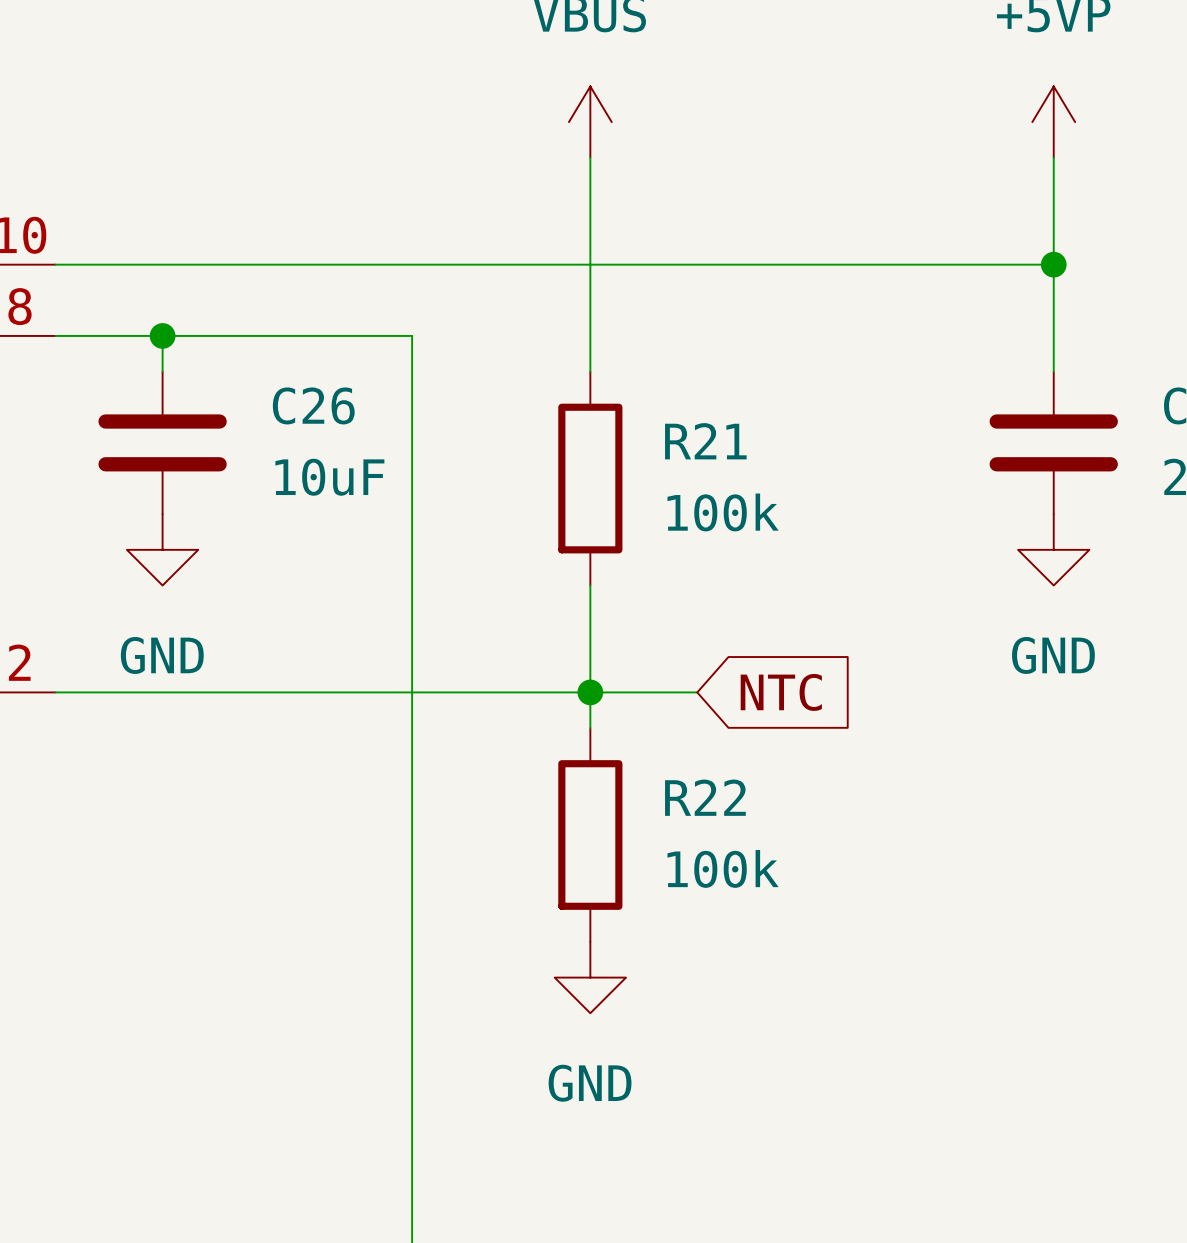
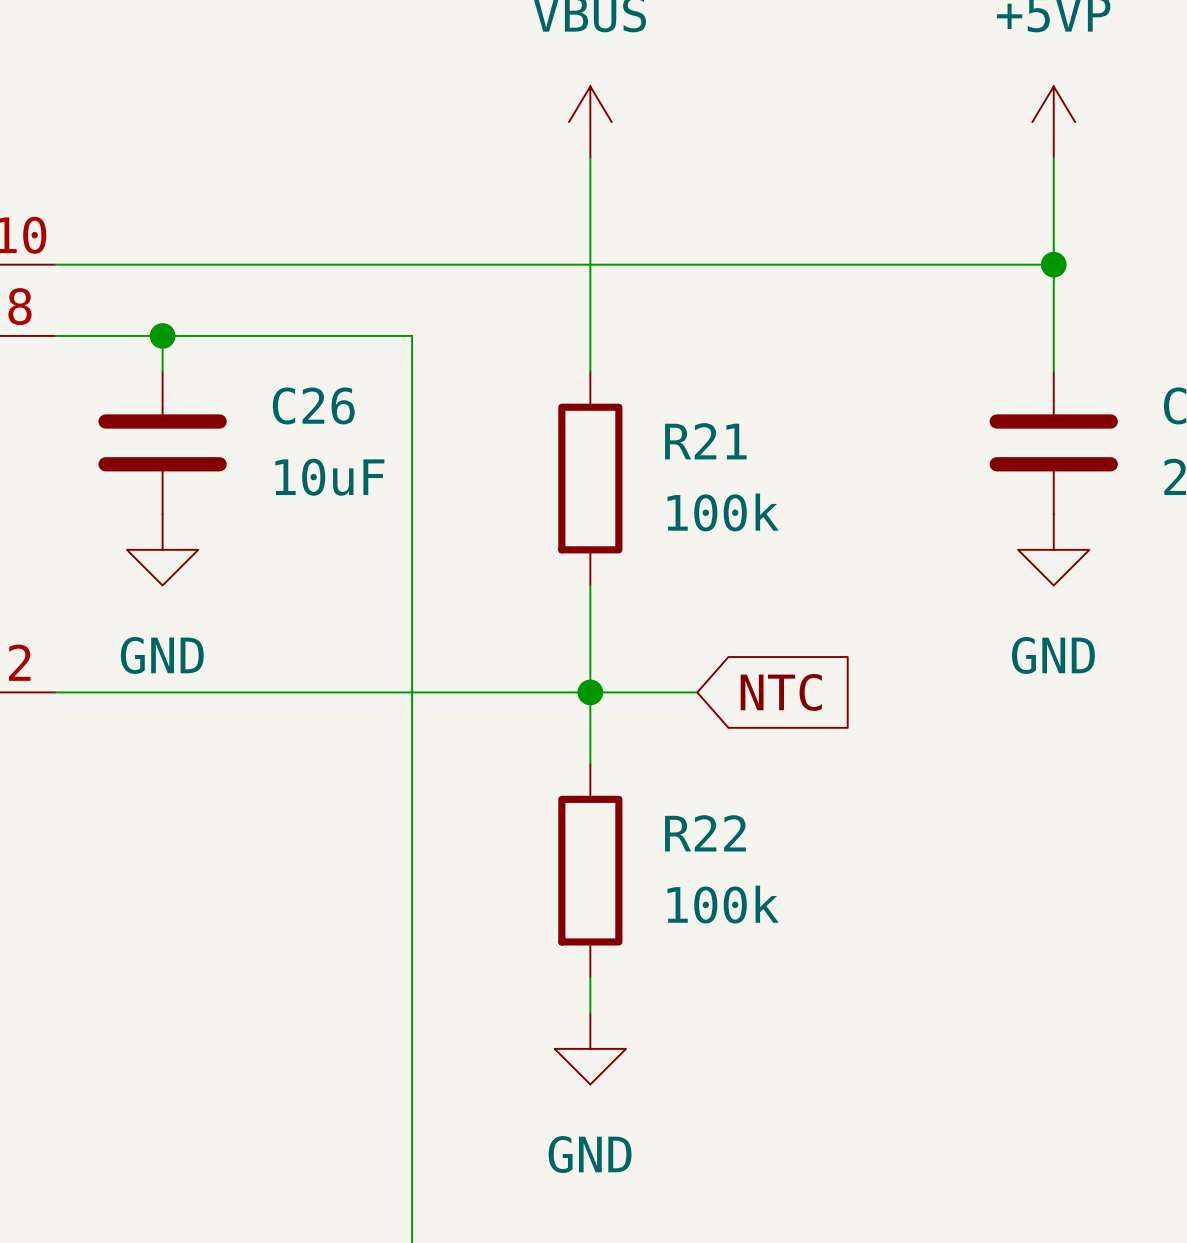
R22 position: (590, 835) -> (590, 870)
wire: none -> (590, 977) (590, 1013)
power symbol position: GND (590, 977) -> GND (590, 1048)

